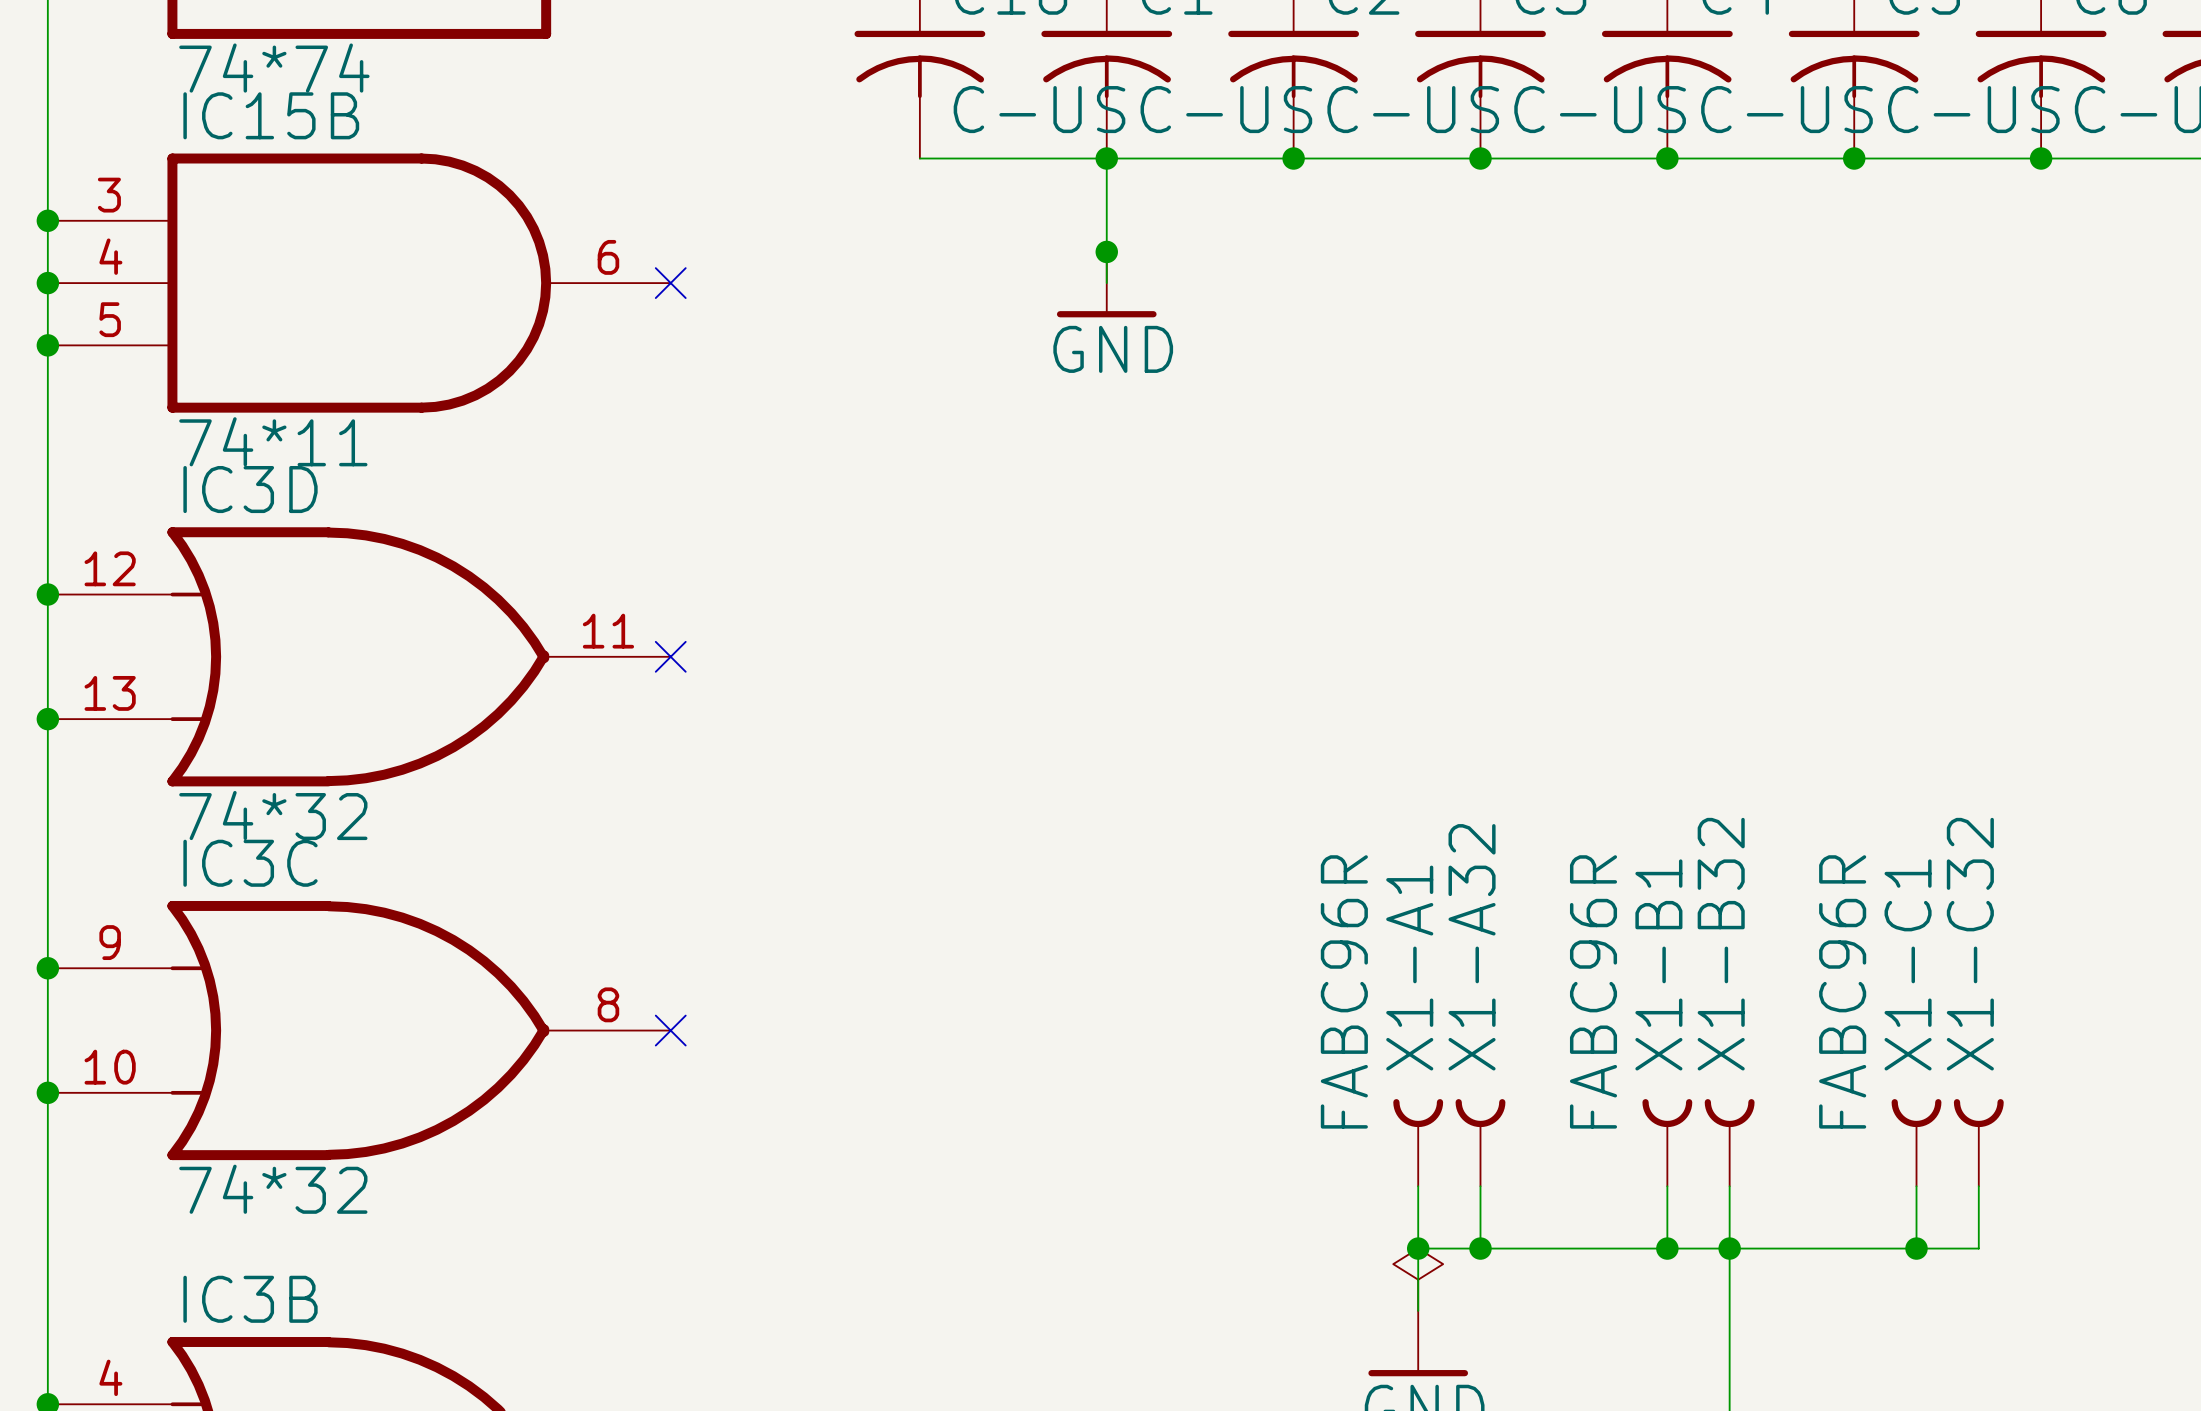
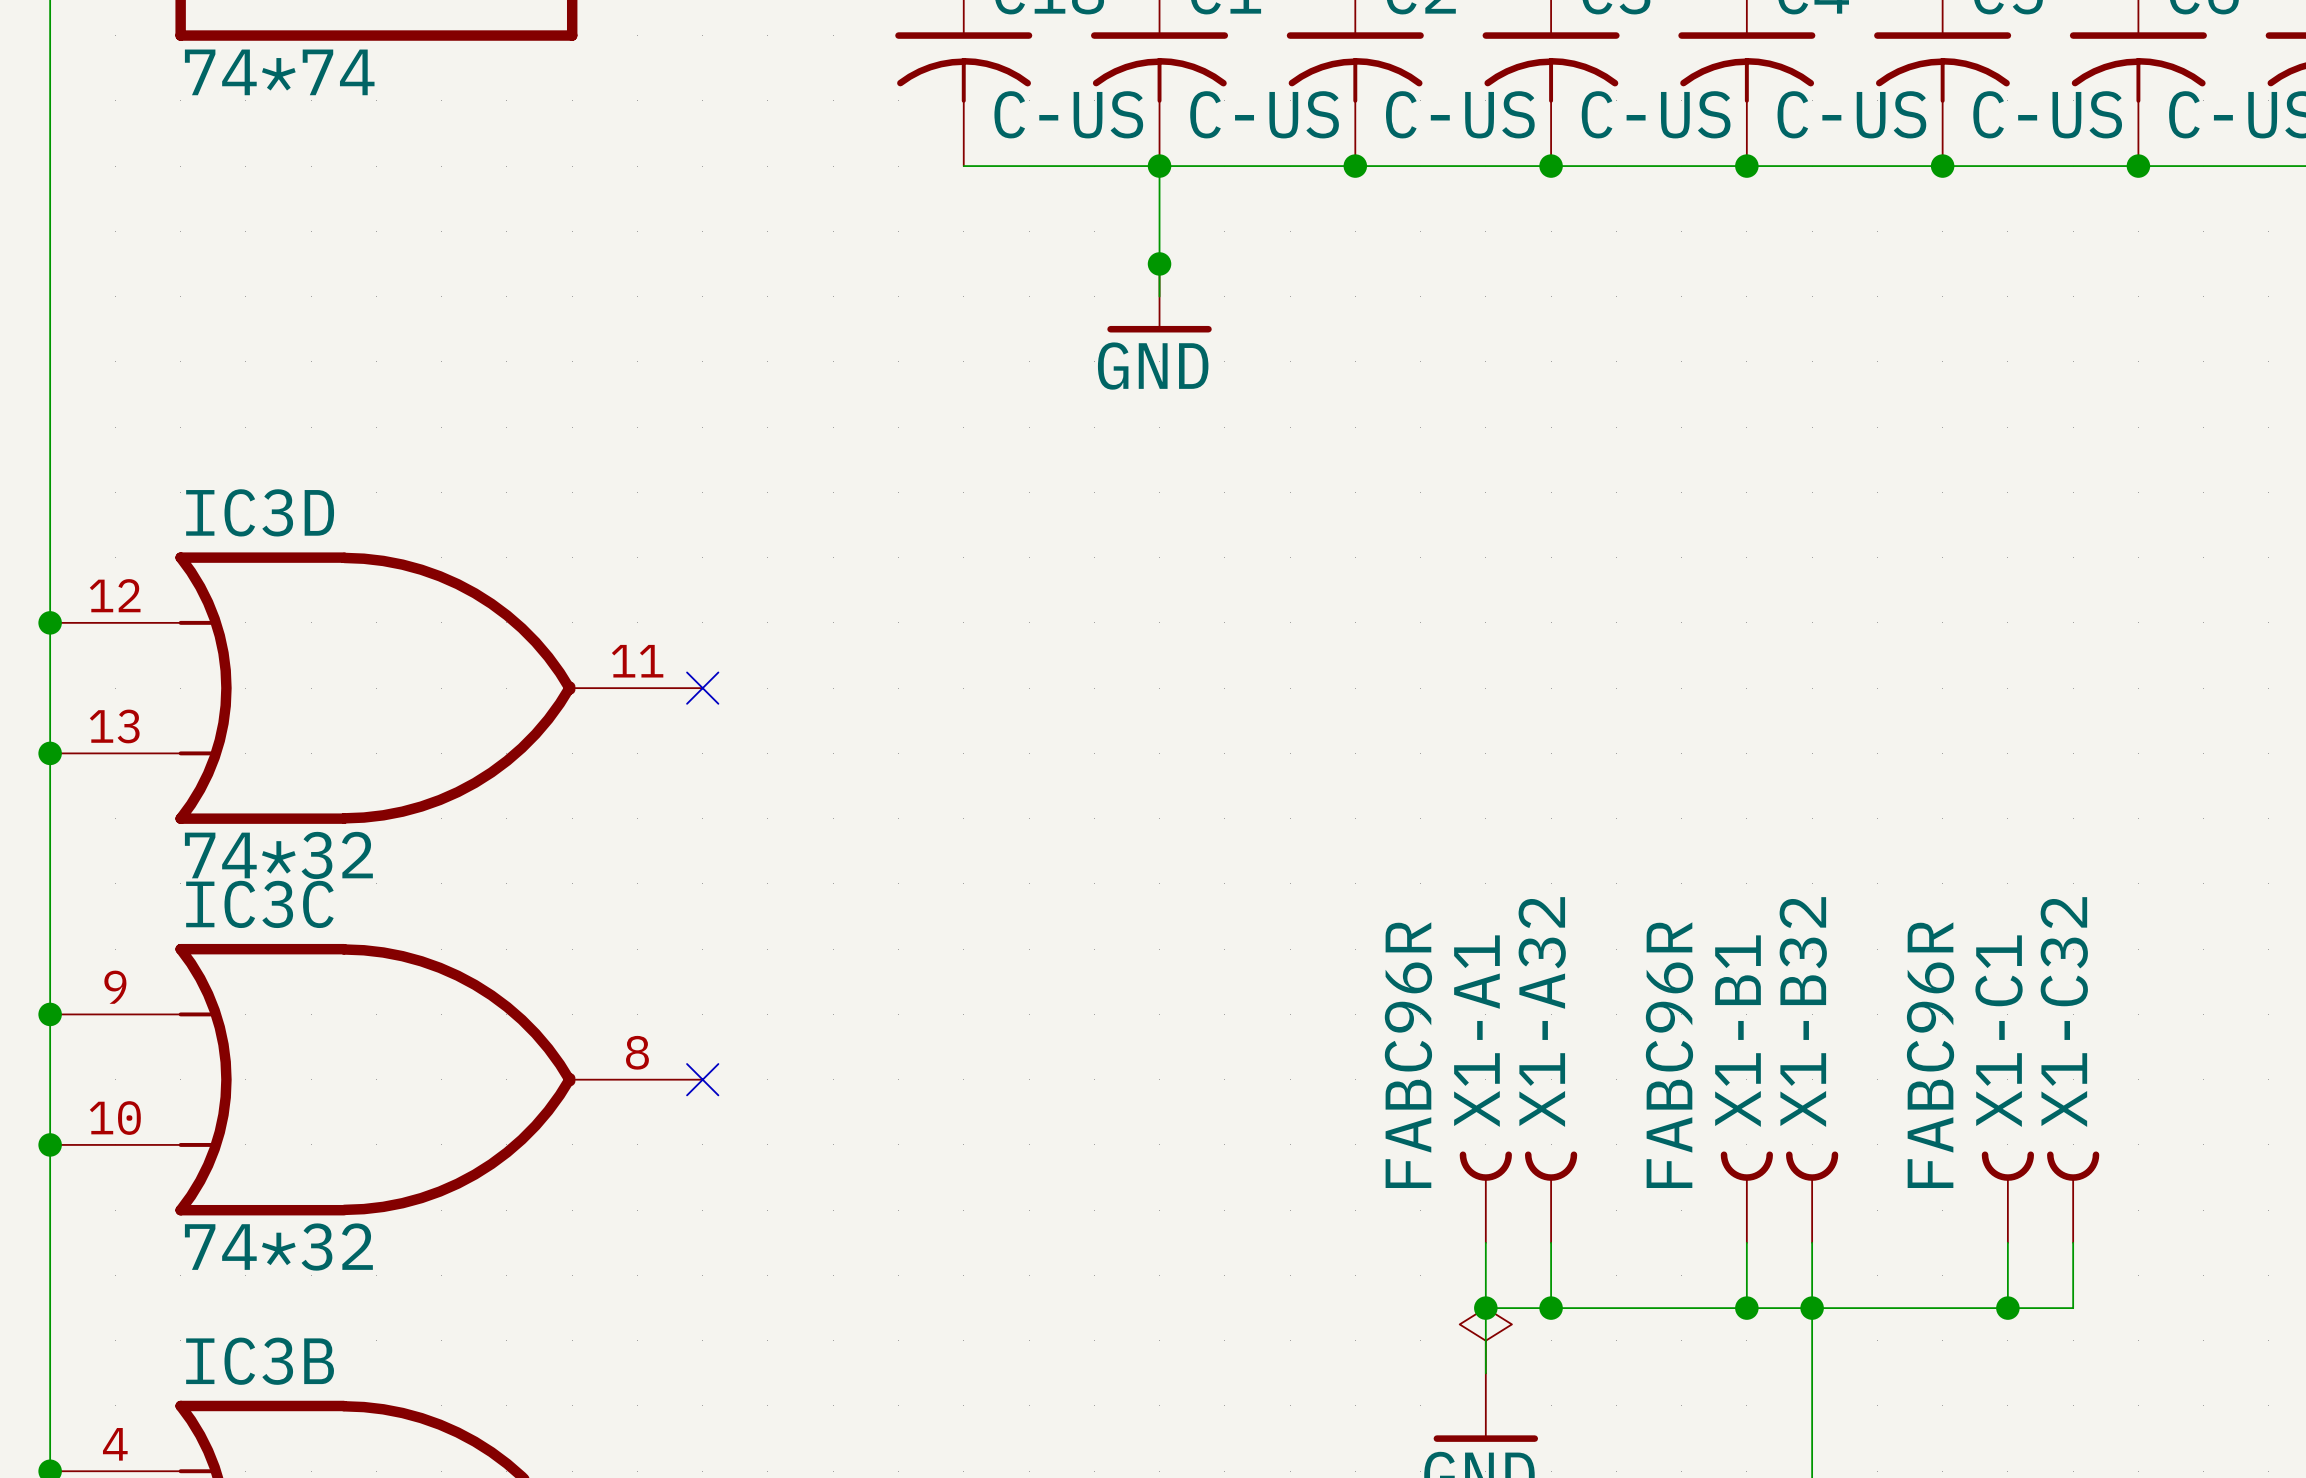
junction: (47, 220) -> none
junction: (47, 283) -> none
IC15B: 74*11 (359, 283) -> none
no-connect mark: (670, 283) -> none
junction: (47, 345) -> none

